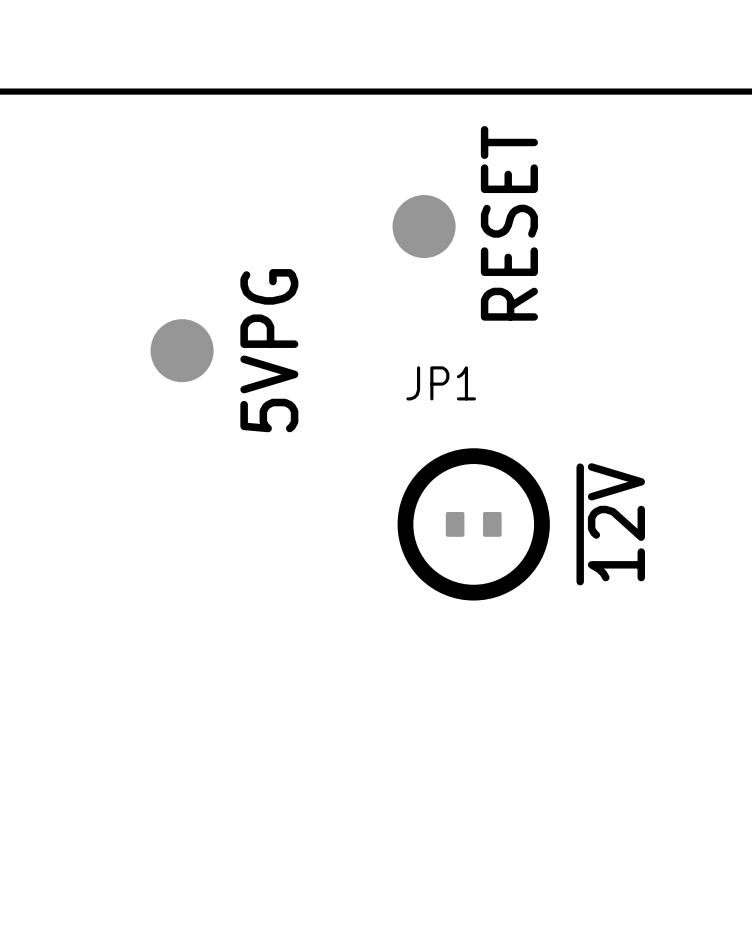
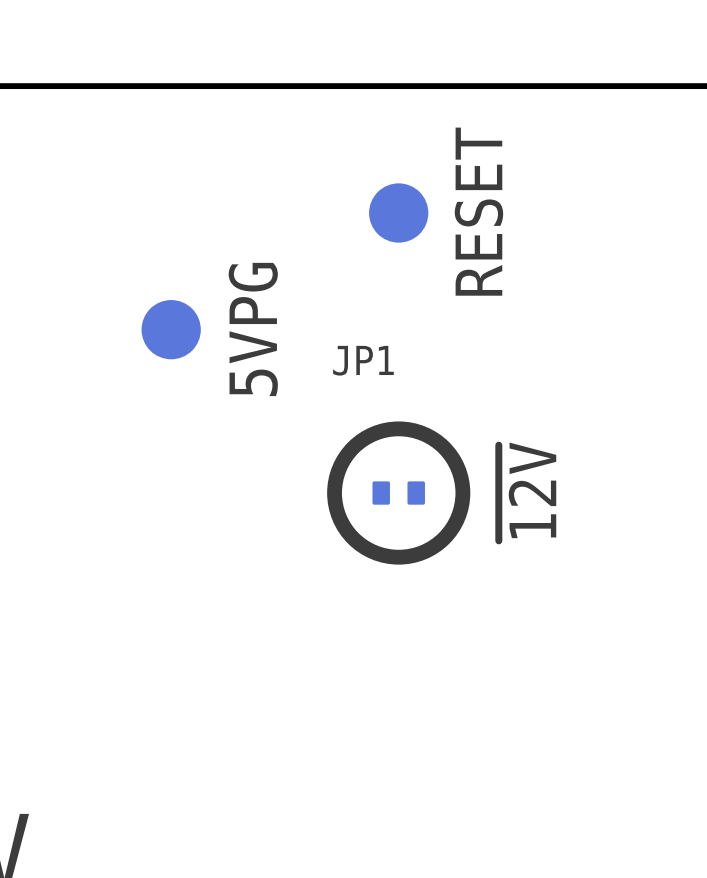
JP1 position: (473, 524) -> (398, 493)
text position: ~{12V} (610, 524) -> ~{12V} (527, 491)

